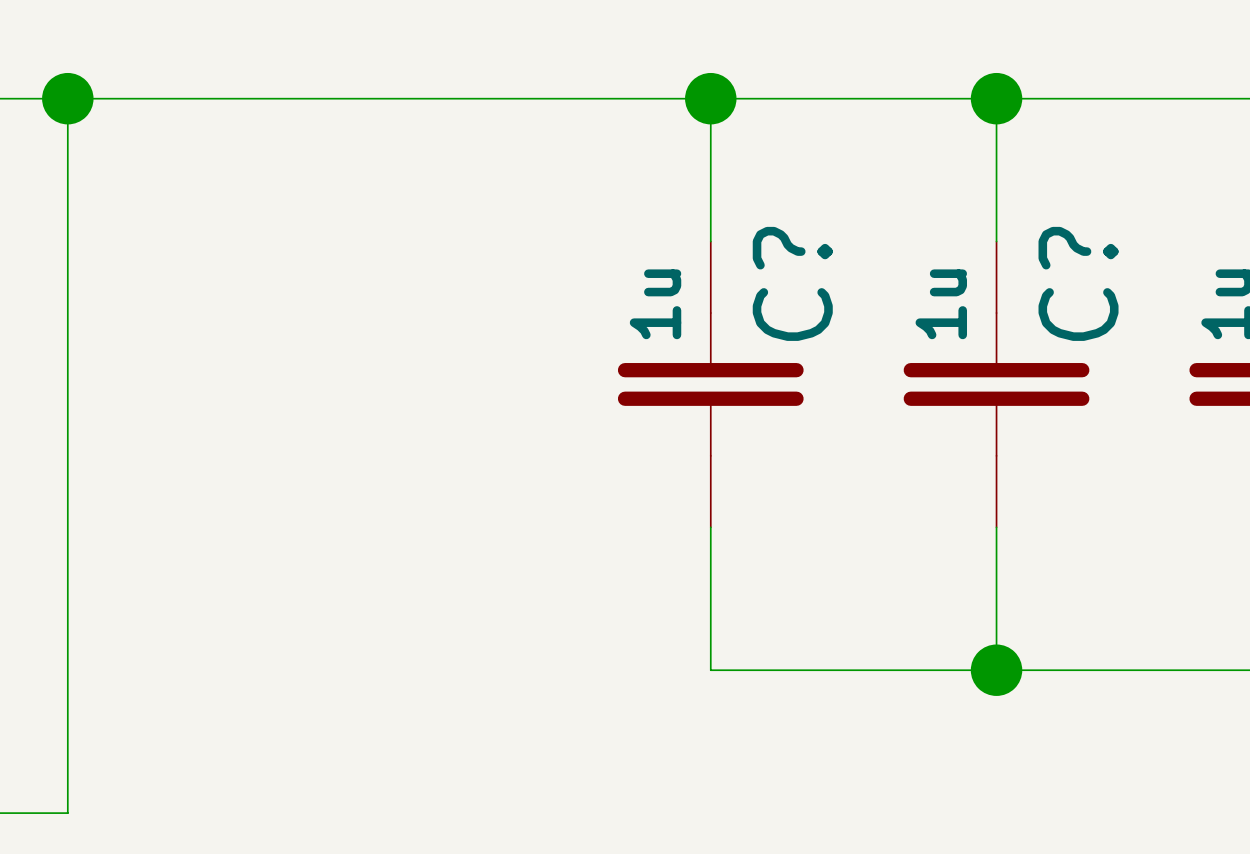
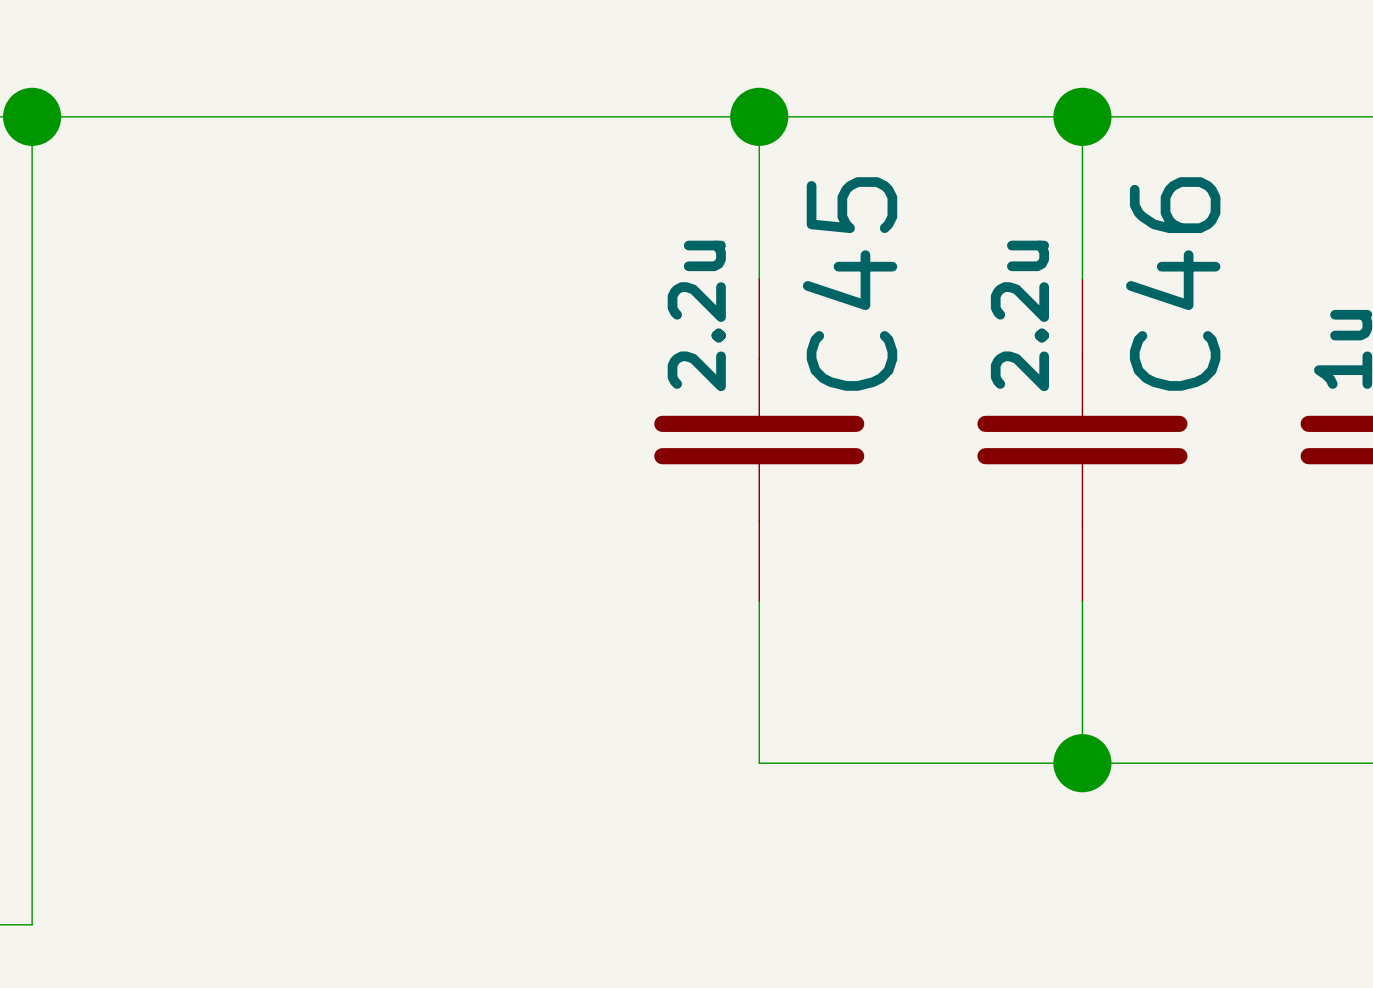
C? name: C? (792, 283) -> C45 (850, 283)
C? name: C? (1078, 283) -> C46 (1173, 283)
C? value: 1u (655, 304) -> 2.2u (696, 315)
C? value: 1u (941, 304) -> 2.2u (1019, 315)

